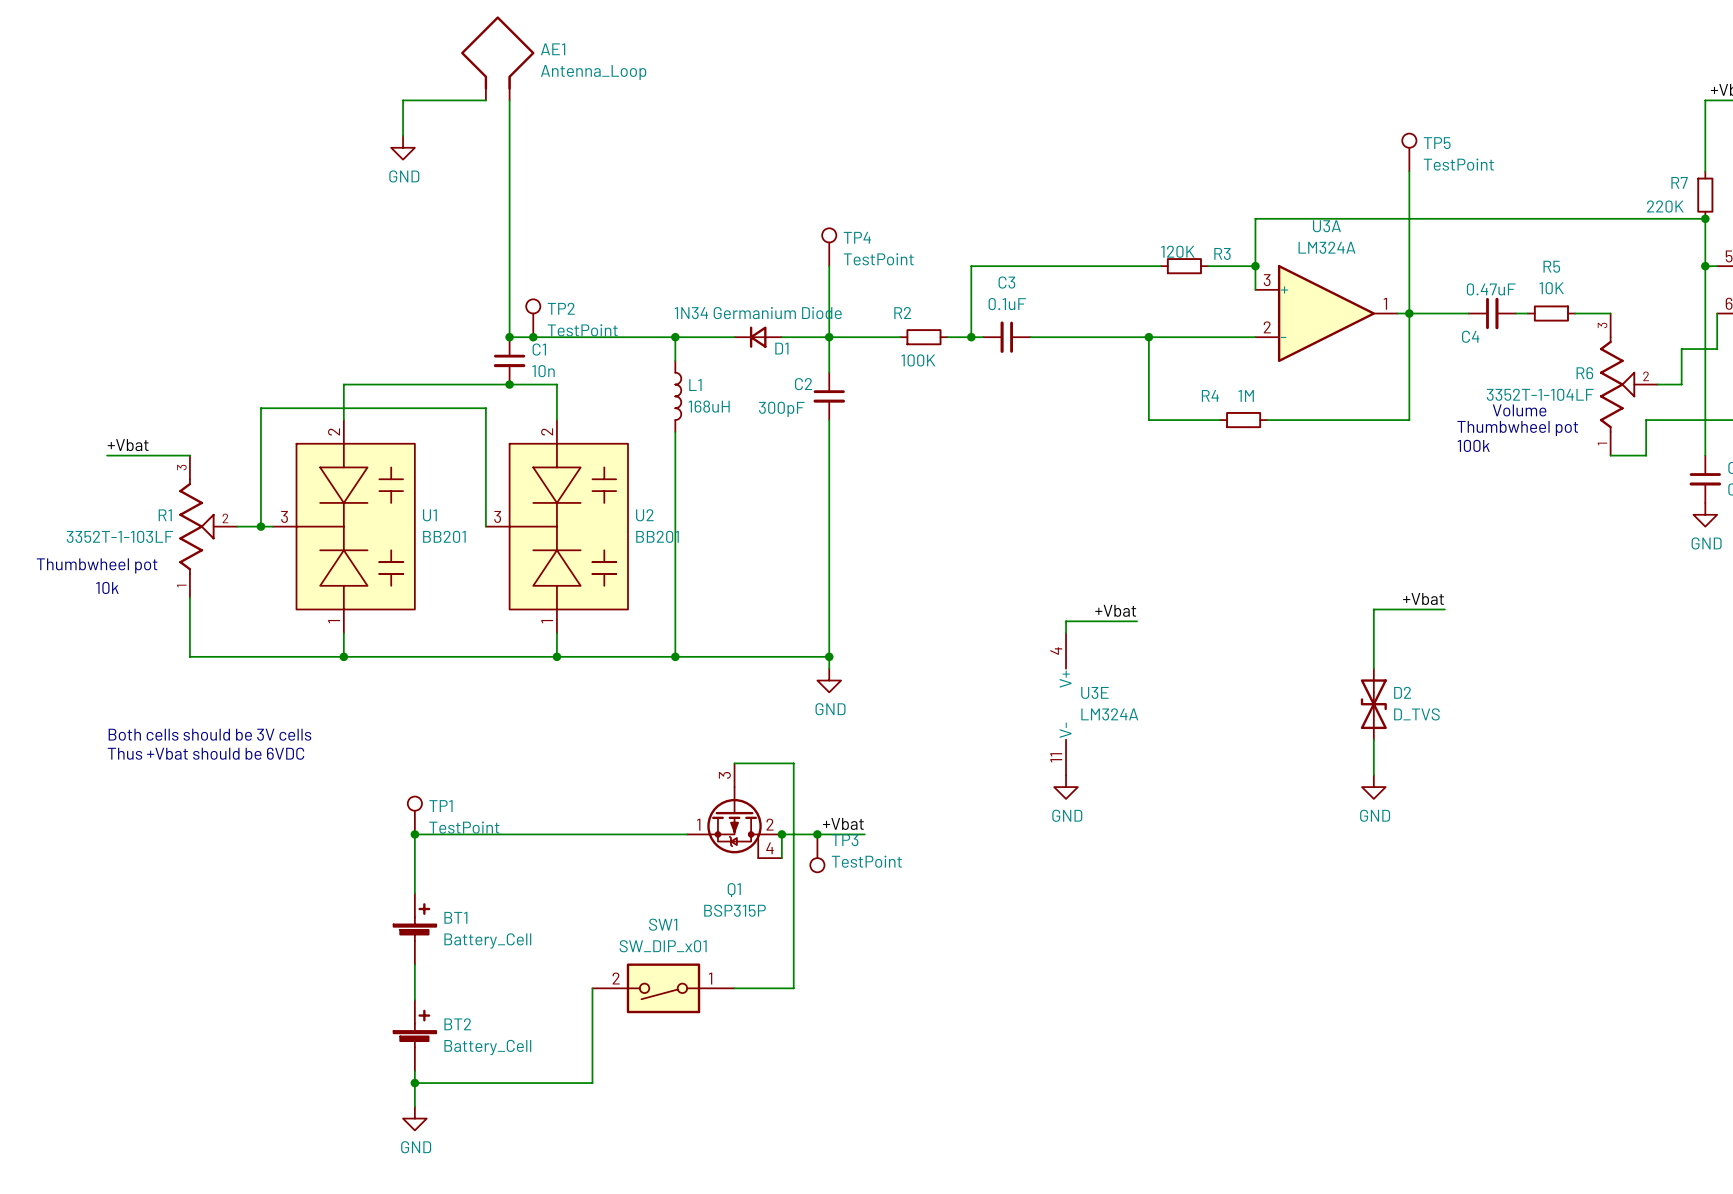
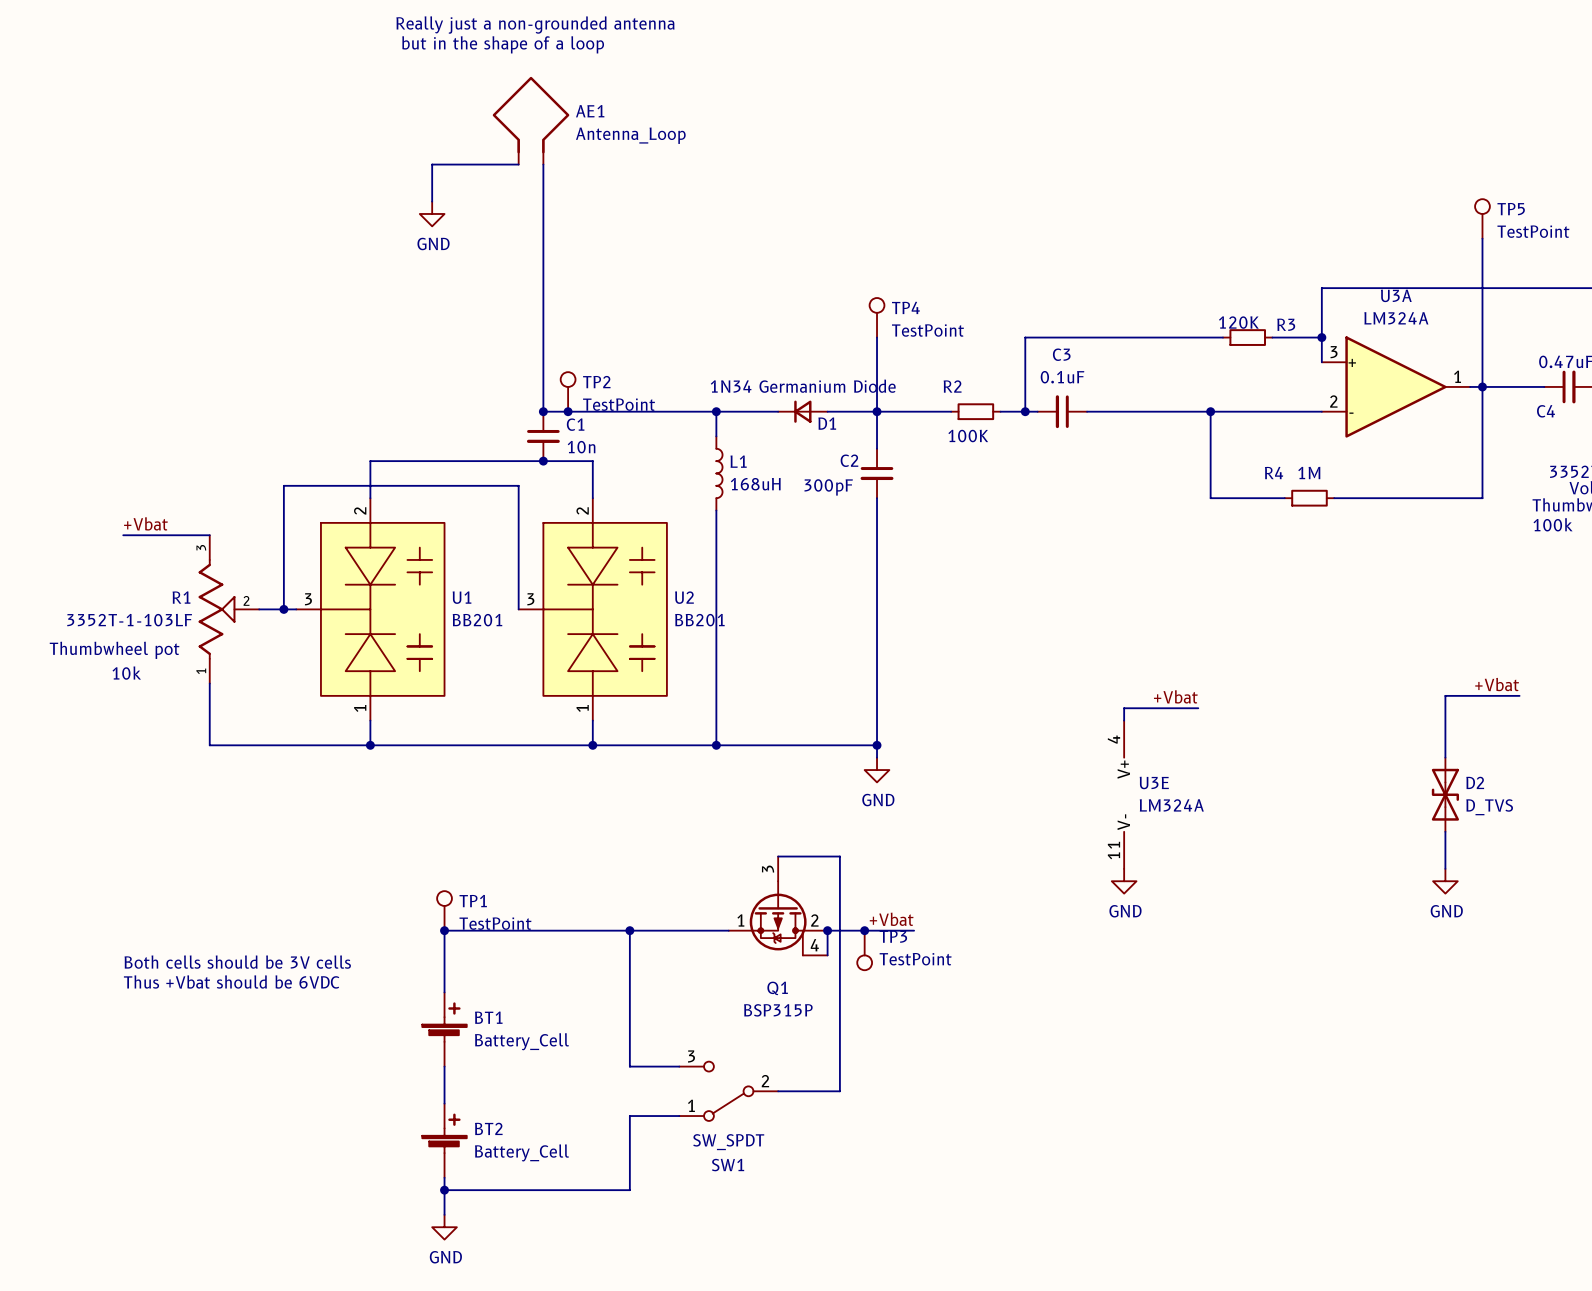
text position: Both cells should be 3V cells (209, 734) -> Both cells should be 3V cells (237, 962)
text position: Thus +Vbat should be 6VDC (205, 753) -> Thus +Vbat should be 6VDC (231, 982)
wire: none -> (629, 930) (629, 1066) (679, 1066)
junction: none -> (629, 930)
SW1 name position: SW1 (663, 924) -> SW1 (728, 1165)
SW1 value: SW_DIP_x01 (663, 946) -> SW_SPDT (728, 1142)
SW1 symbol: [592, 963, 735, 1014] -> [679, 1061, 779, 1121]
wire: (592, 988) (592, 1012) -> (679, 1116) (629, 1116)

